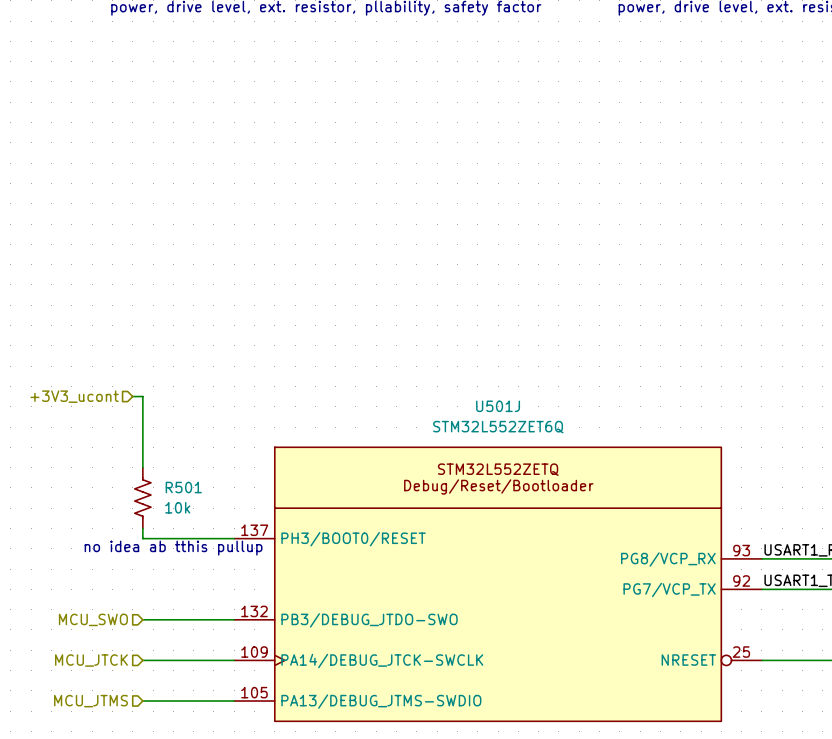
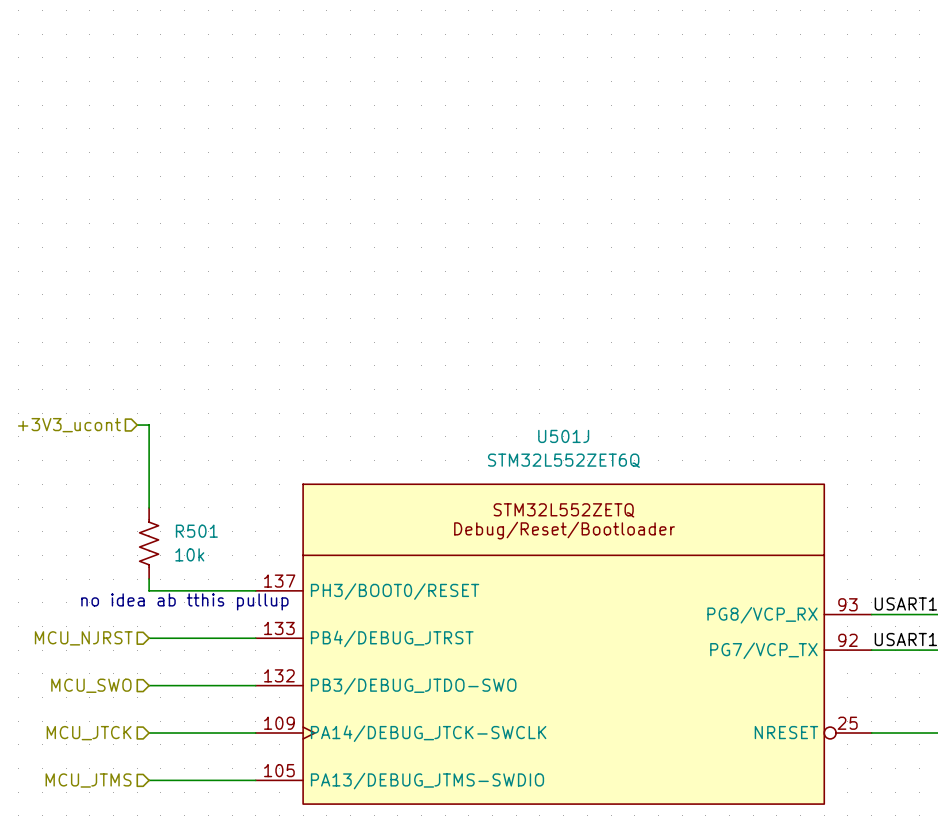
U501J symbol: [234, 447, 762, 722] -> [255, 484, 872, 805]
hierarchical label: none -> MCU_NJRST (83, 638)
wire: none -> (149, 638) (255, 638)

